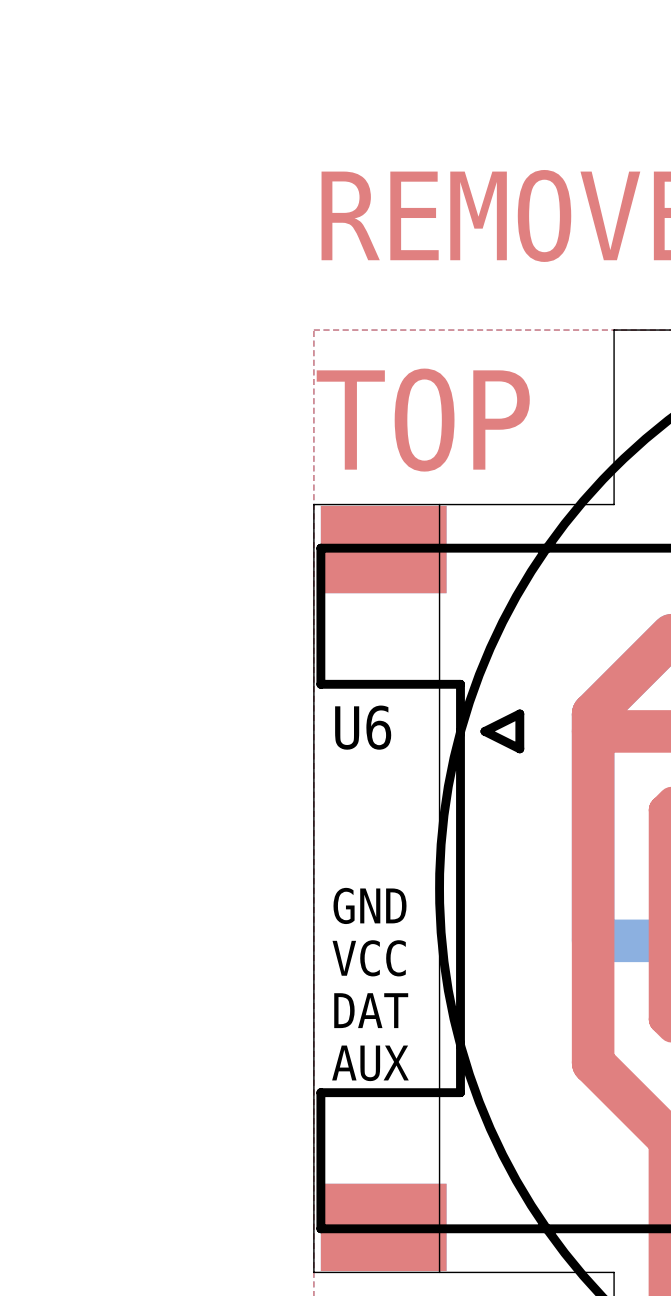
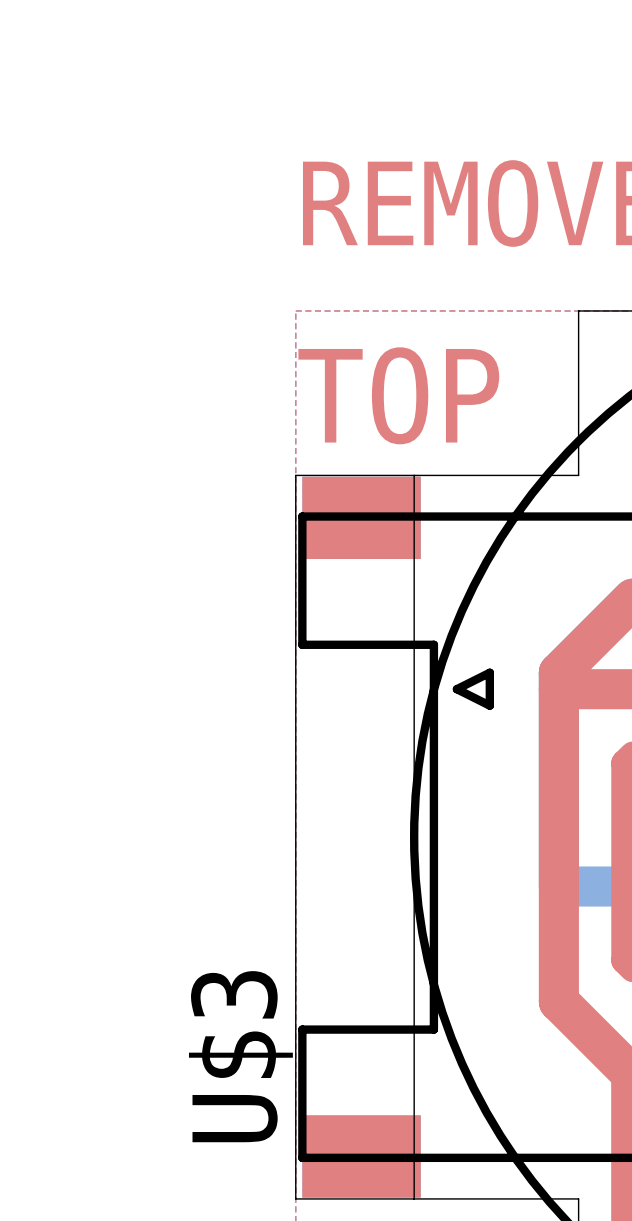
U6 name: U6 (363, 727) -> U$3 (240, 1056)
text: GND (370, 905) -> none
text: VCC (369, 958) -> none
text: DAT (371, 1010) -> none
text: AUX (370, 1063) -> none

